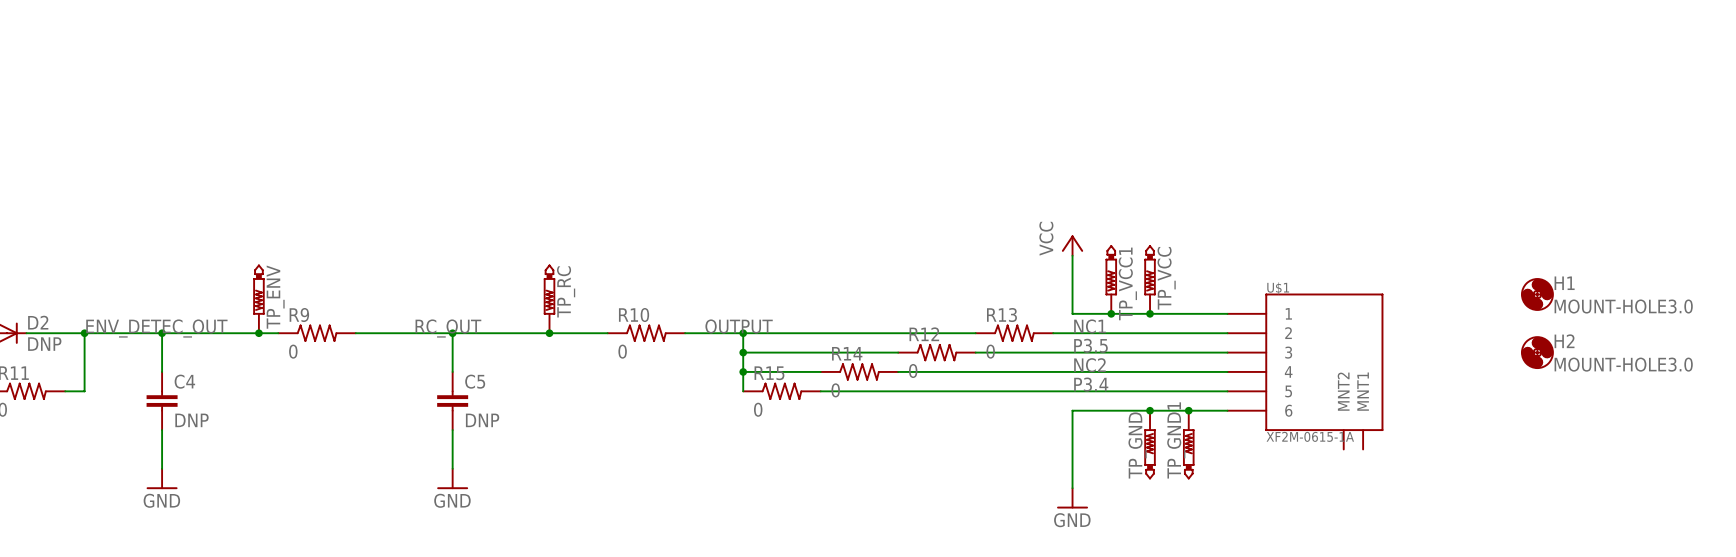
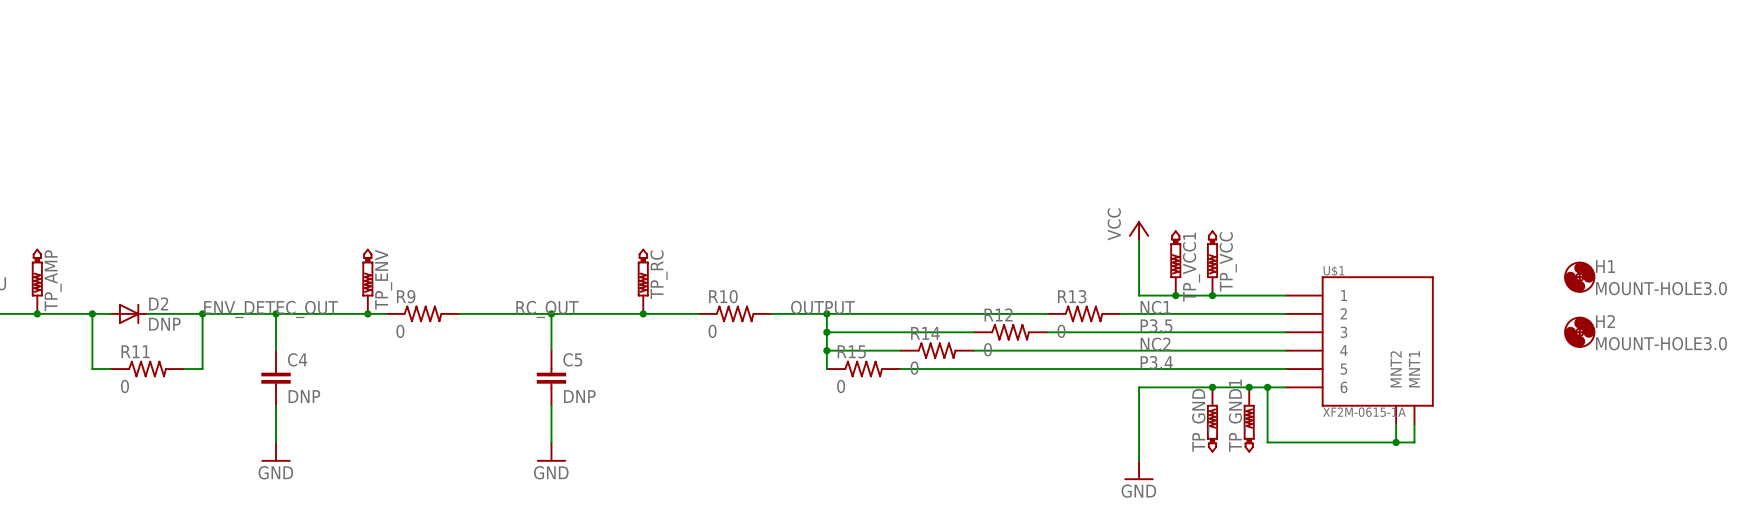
wire: none -> (1267, 387) (1267, 442) (1414, 442) (1414, 424)
junction: none -> (1267, 387)
wire: none -> (1396, 424) (1396, 442)
junction: none -> (1396, 442)

